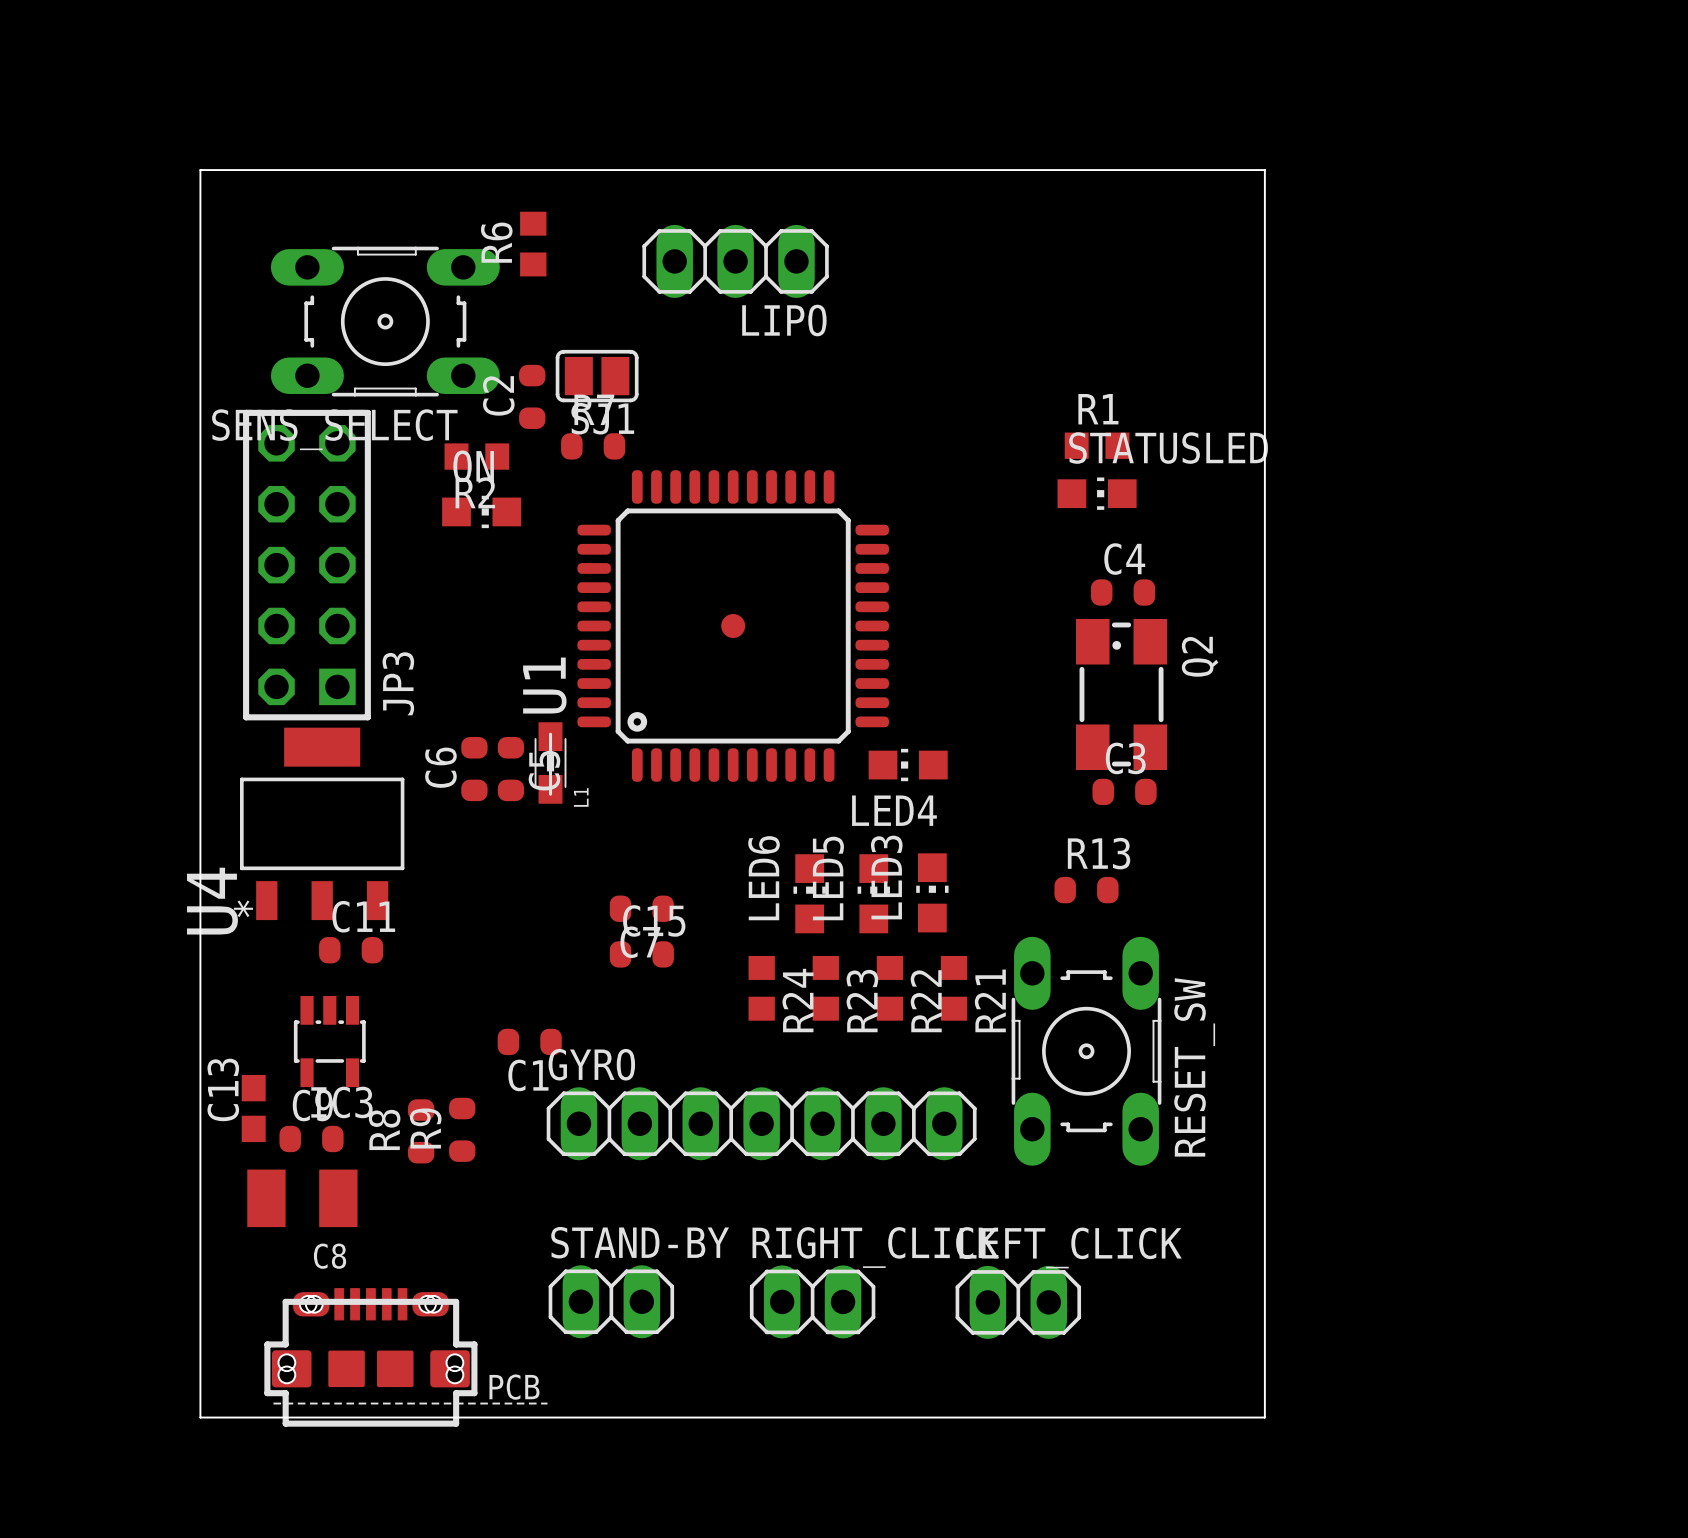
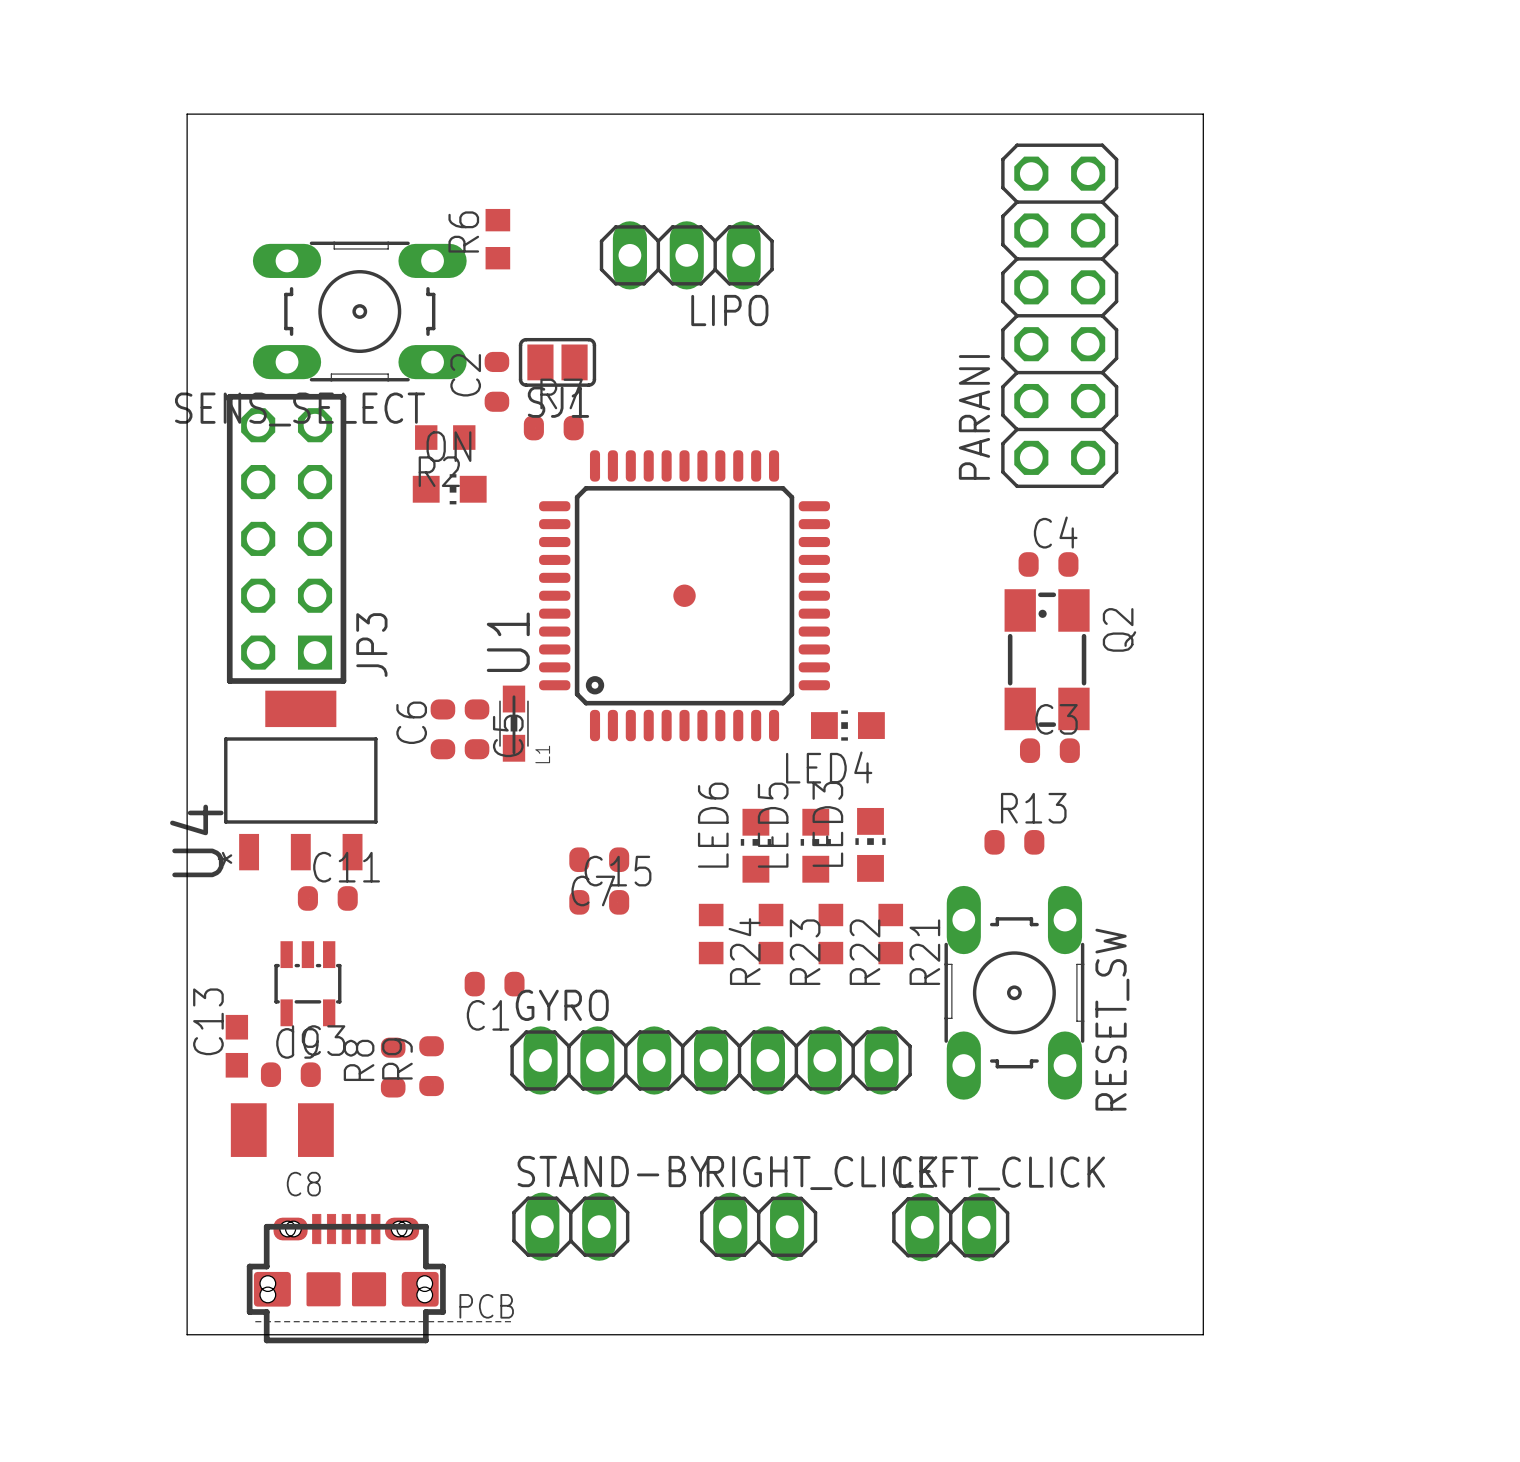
board edge: (200, 170) (1264, 170) (1264, 1417) -> (187, 170) (187, 114) (1203, 114) (1203, 1334) (1180, 1334)
PARANI: none -> (1059, 315)
R1: (1097, 445) -> none
STATUSLED: (1097, 493) -> none

